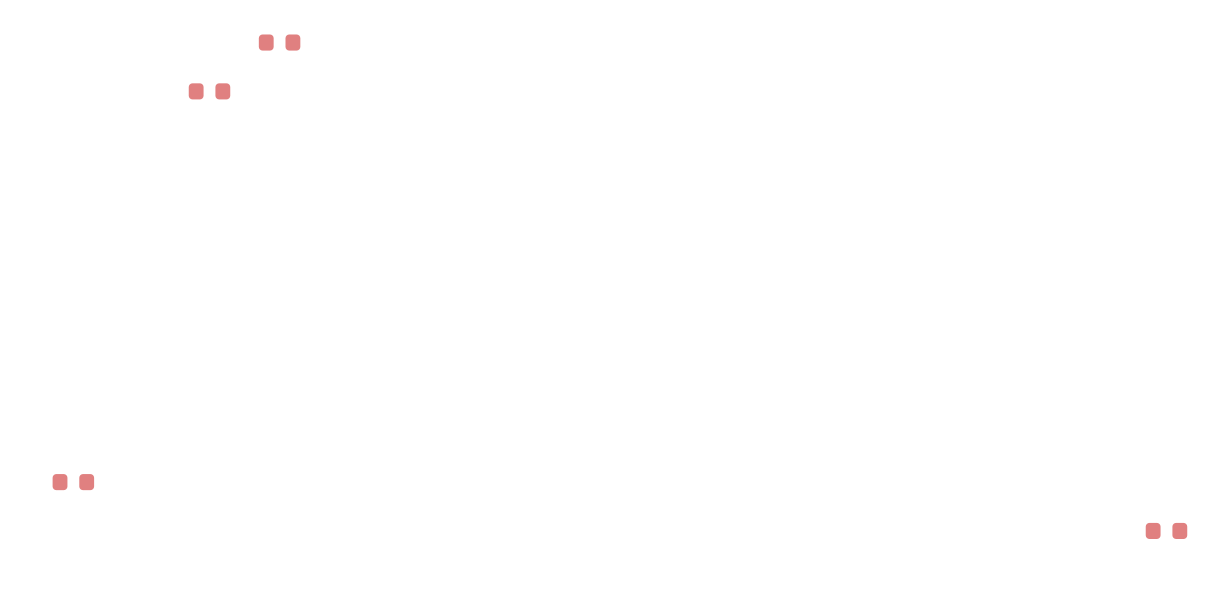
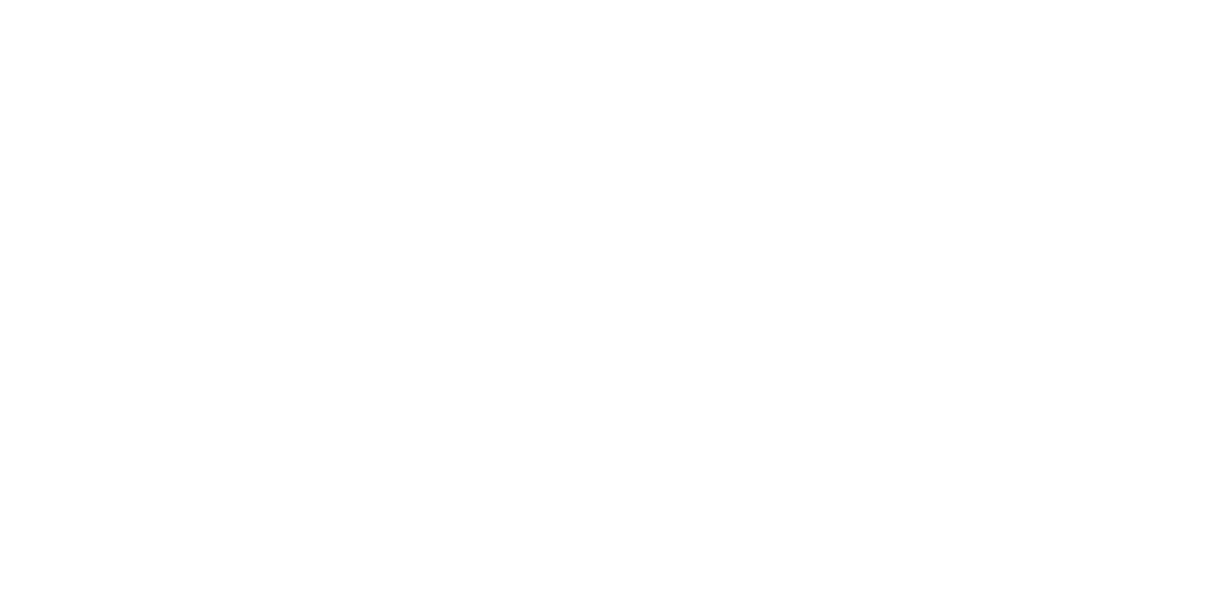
part: (279, 42) -> none
part: (209, 91) -> none
part: (73, 482) -> none
part: (1166, 530) -> none

